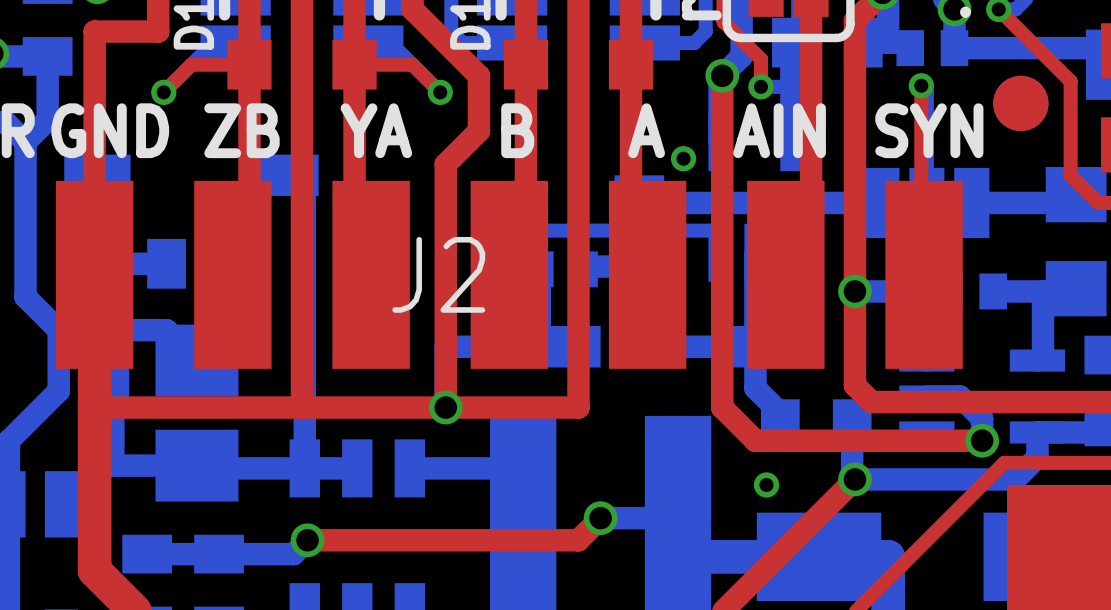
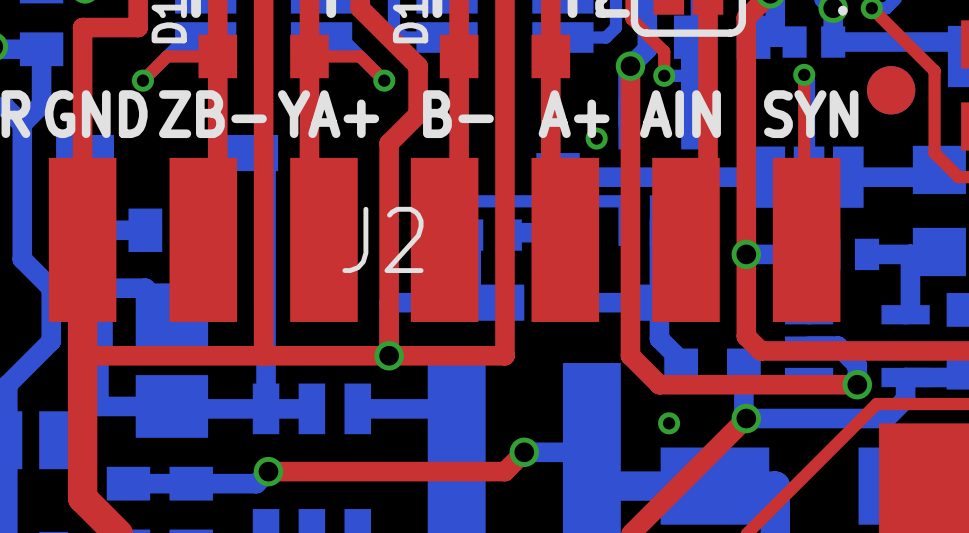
text: ZB (241, 130) -> ZB- (212, 114)
text: YA (376, 130) -> YA+ (328, 114)
text: B (517, 130) -> B- (458, 114)
text: A (646, 130) -> A+ (574, 114)

